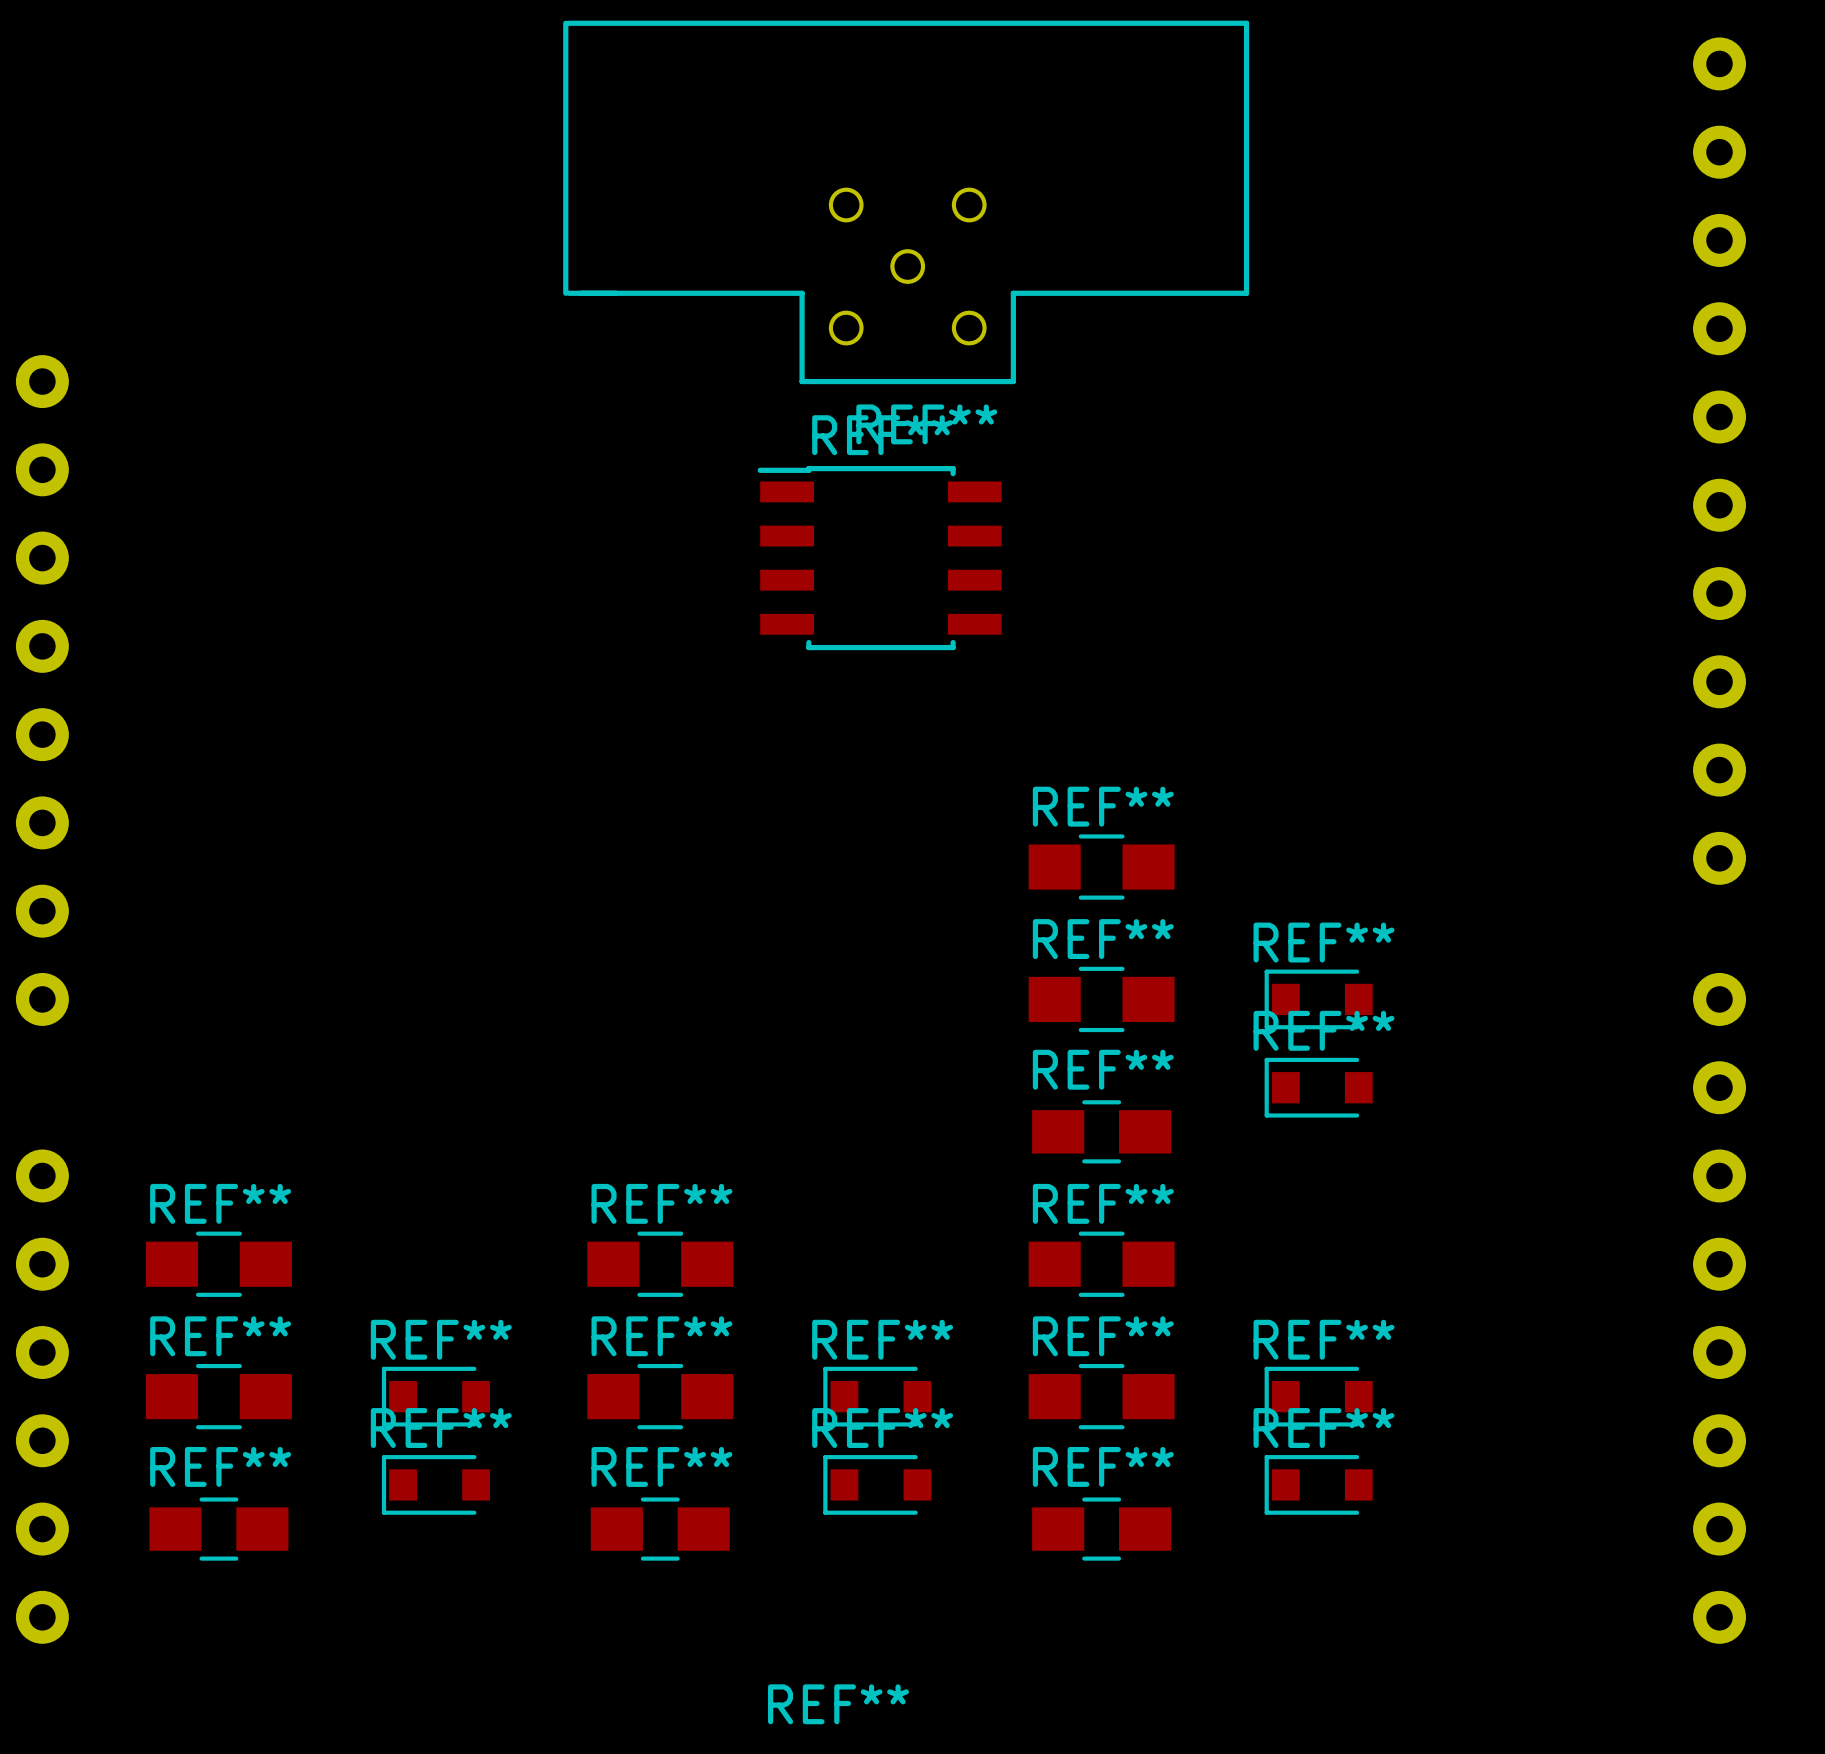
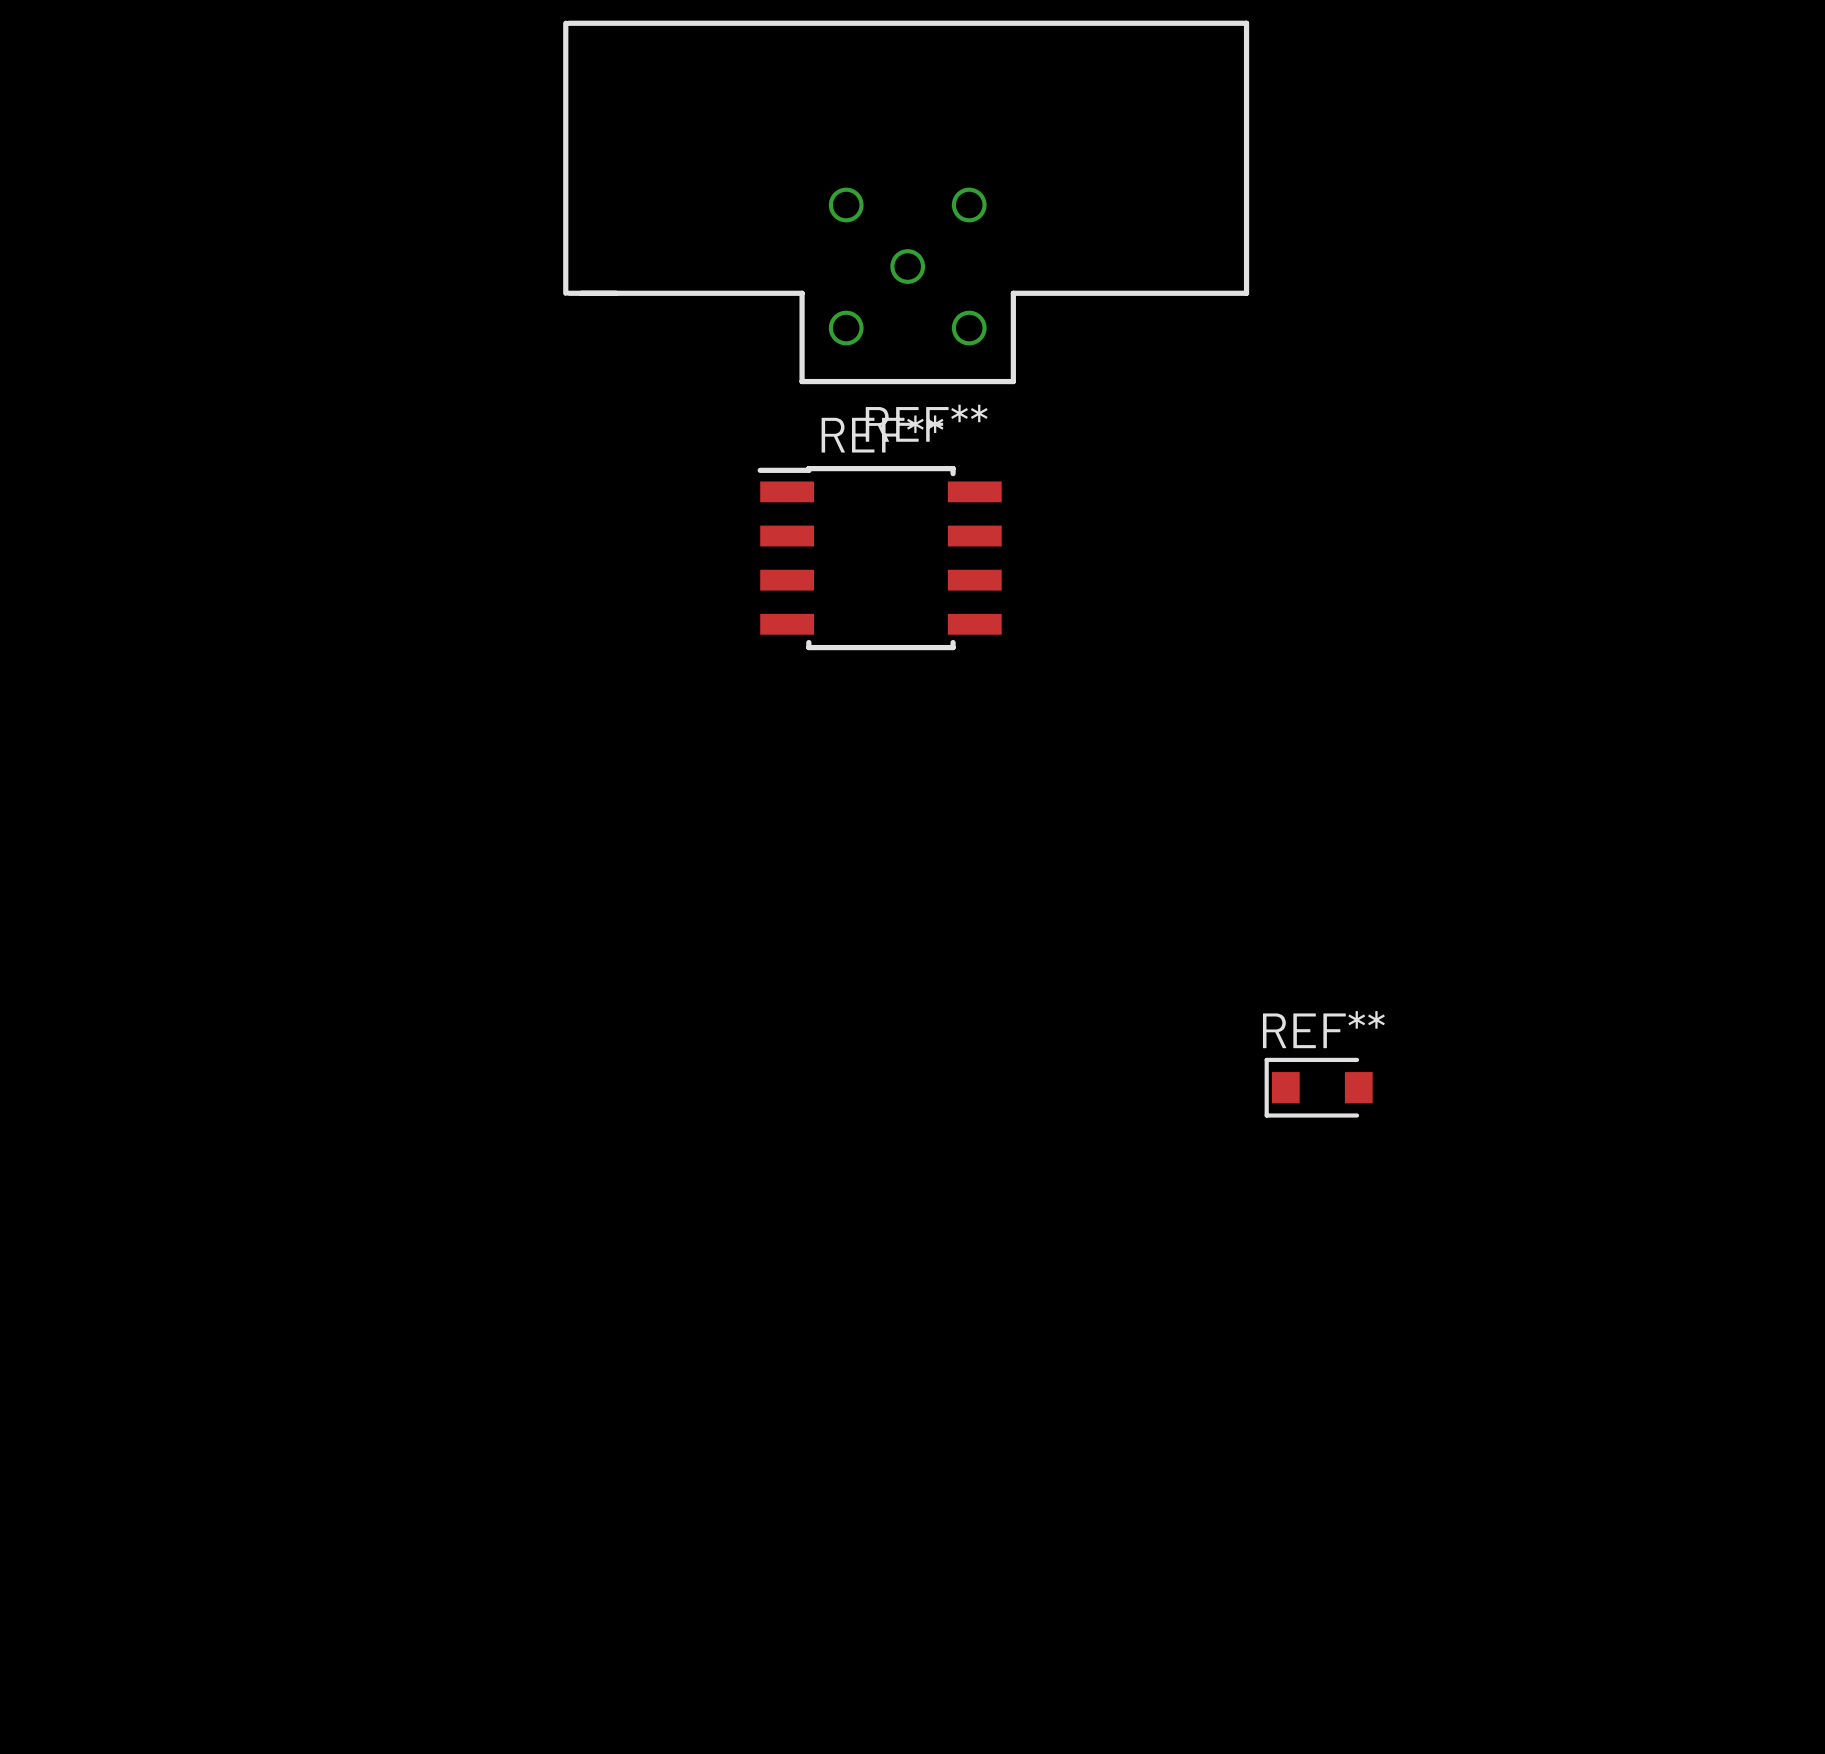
REF**: (880, 840) -> none
REF**: (1101, 867) -> none
REF**: (1101, 999) -> none
REF**: (1318, 999) -> none
REF**: (1101, 1131) -> none
REF**: (218, 1264) -> none
REF**: (660, 1264) -> none
REF**: (1101, 1264) -> none
REF**: (218, 1396) -> none
REF**: (435, 1396) -> none
REF**: (660, 1396) -> none
REF**: (877, 1396) -> none
REF**: (1101, 1396) -> none
REF**: (1318, 1396) -> none
REF**: (435, 1484) -> none
REF**: (877, 1484) -> none
REF**: (1318, 1484) -> none
REF**: (218, 1529) -> none
REF**: (660, 1529) -> none
REF**: (1101, 1529) -> none

